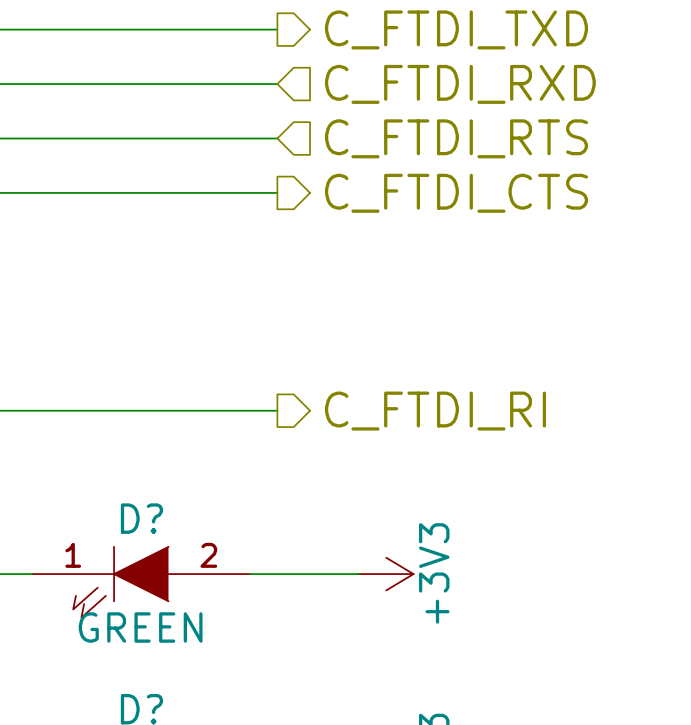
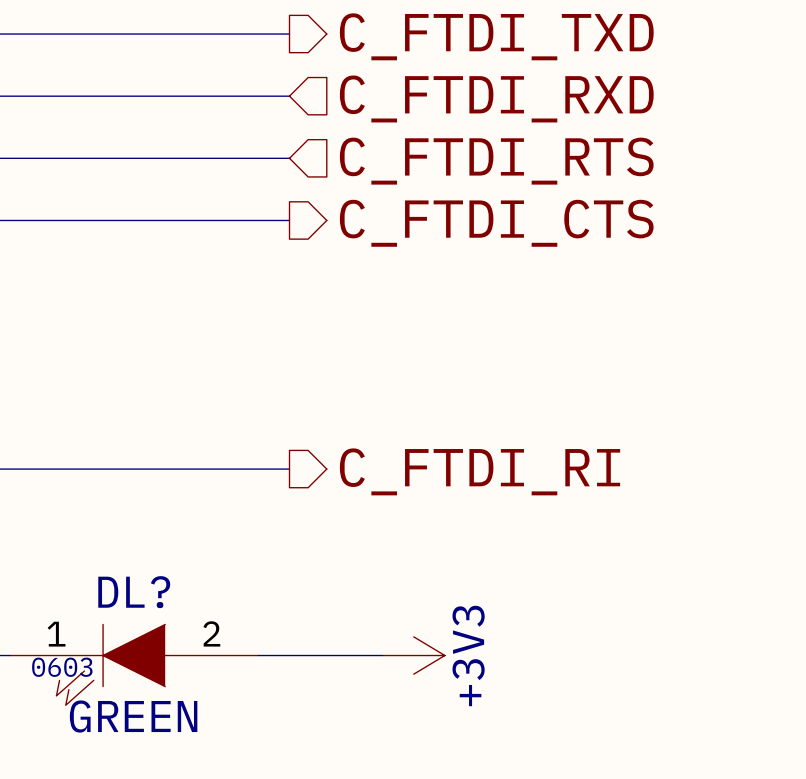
D? name: D? (141, 518) -> DL? (134, 592)
D? text: none -> 0603 (62, 667)

